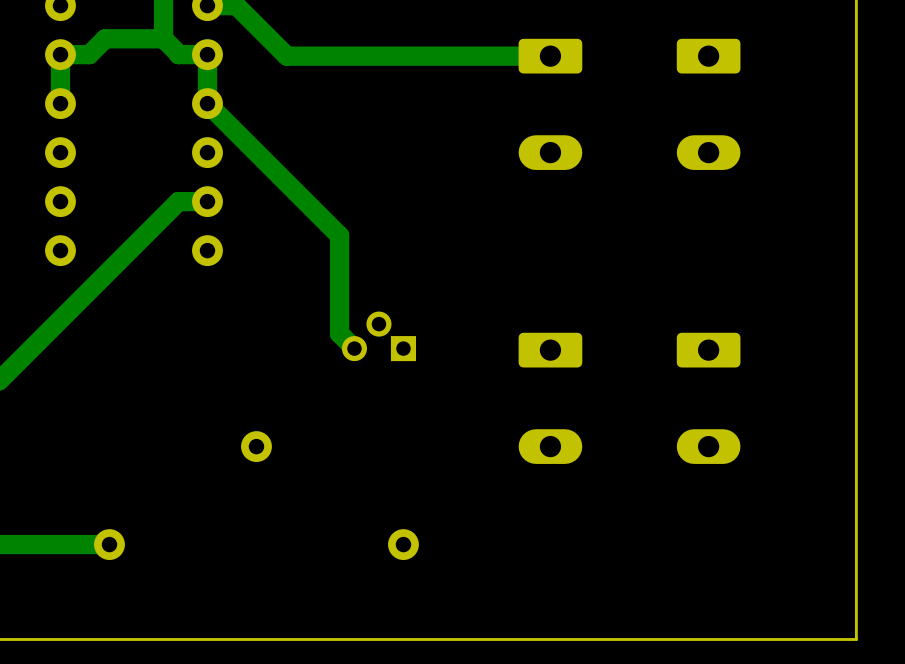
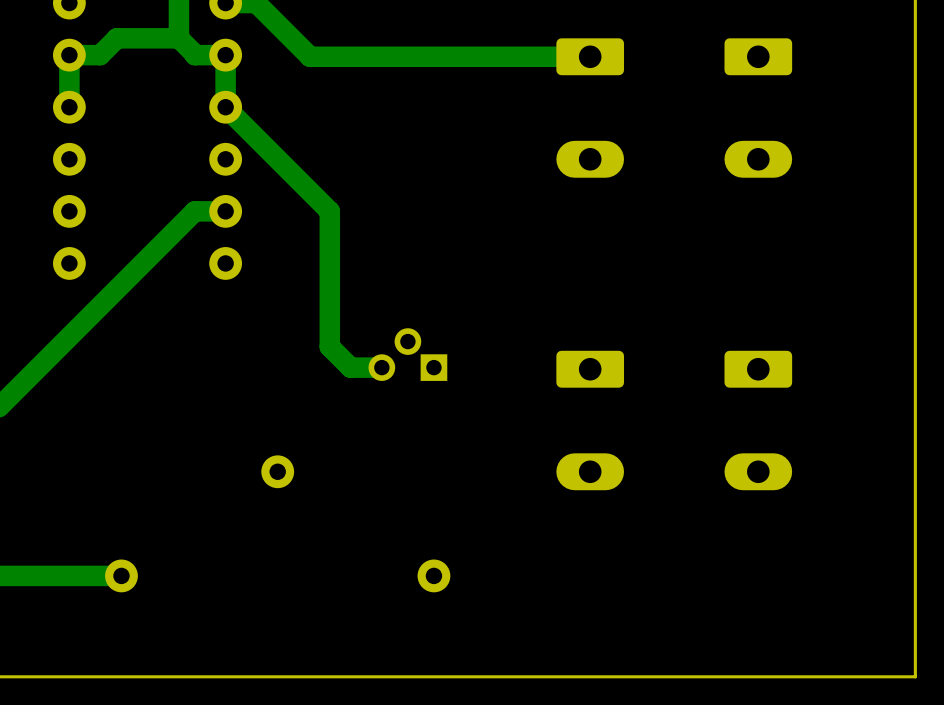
track: (305, 201) (339, 235) (339, 333) (354, 348) -> (329, 211) (329, 346) (350, 367) (381, 367)

